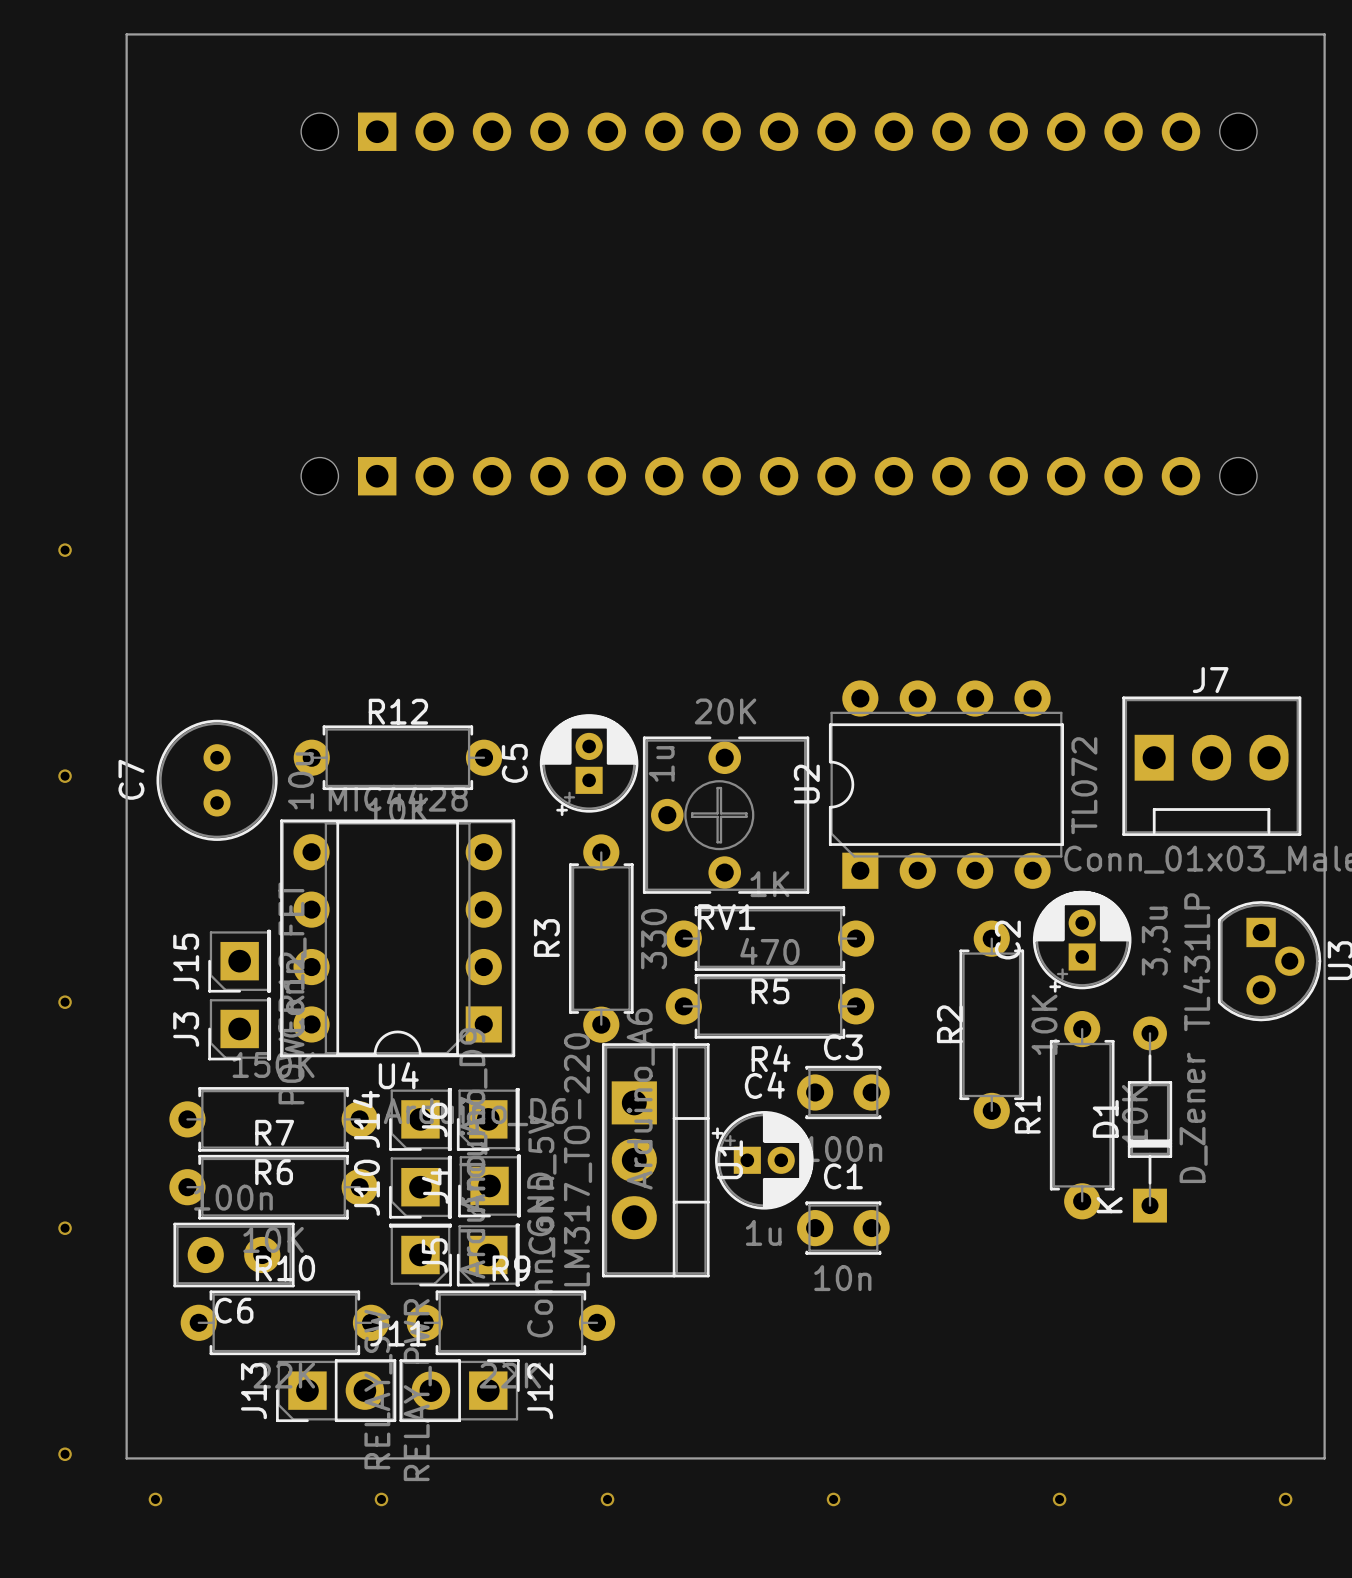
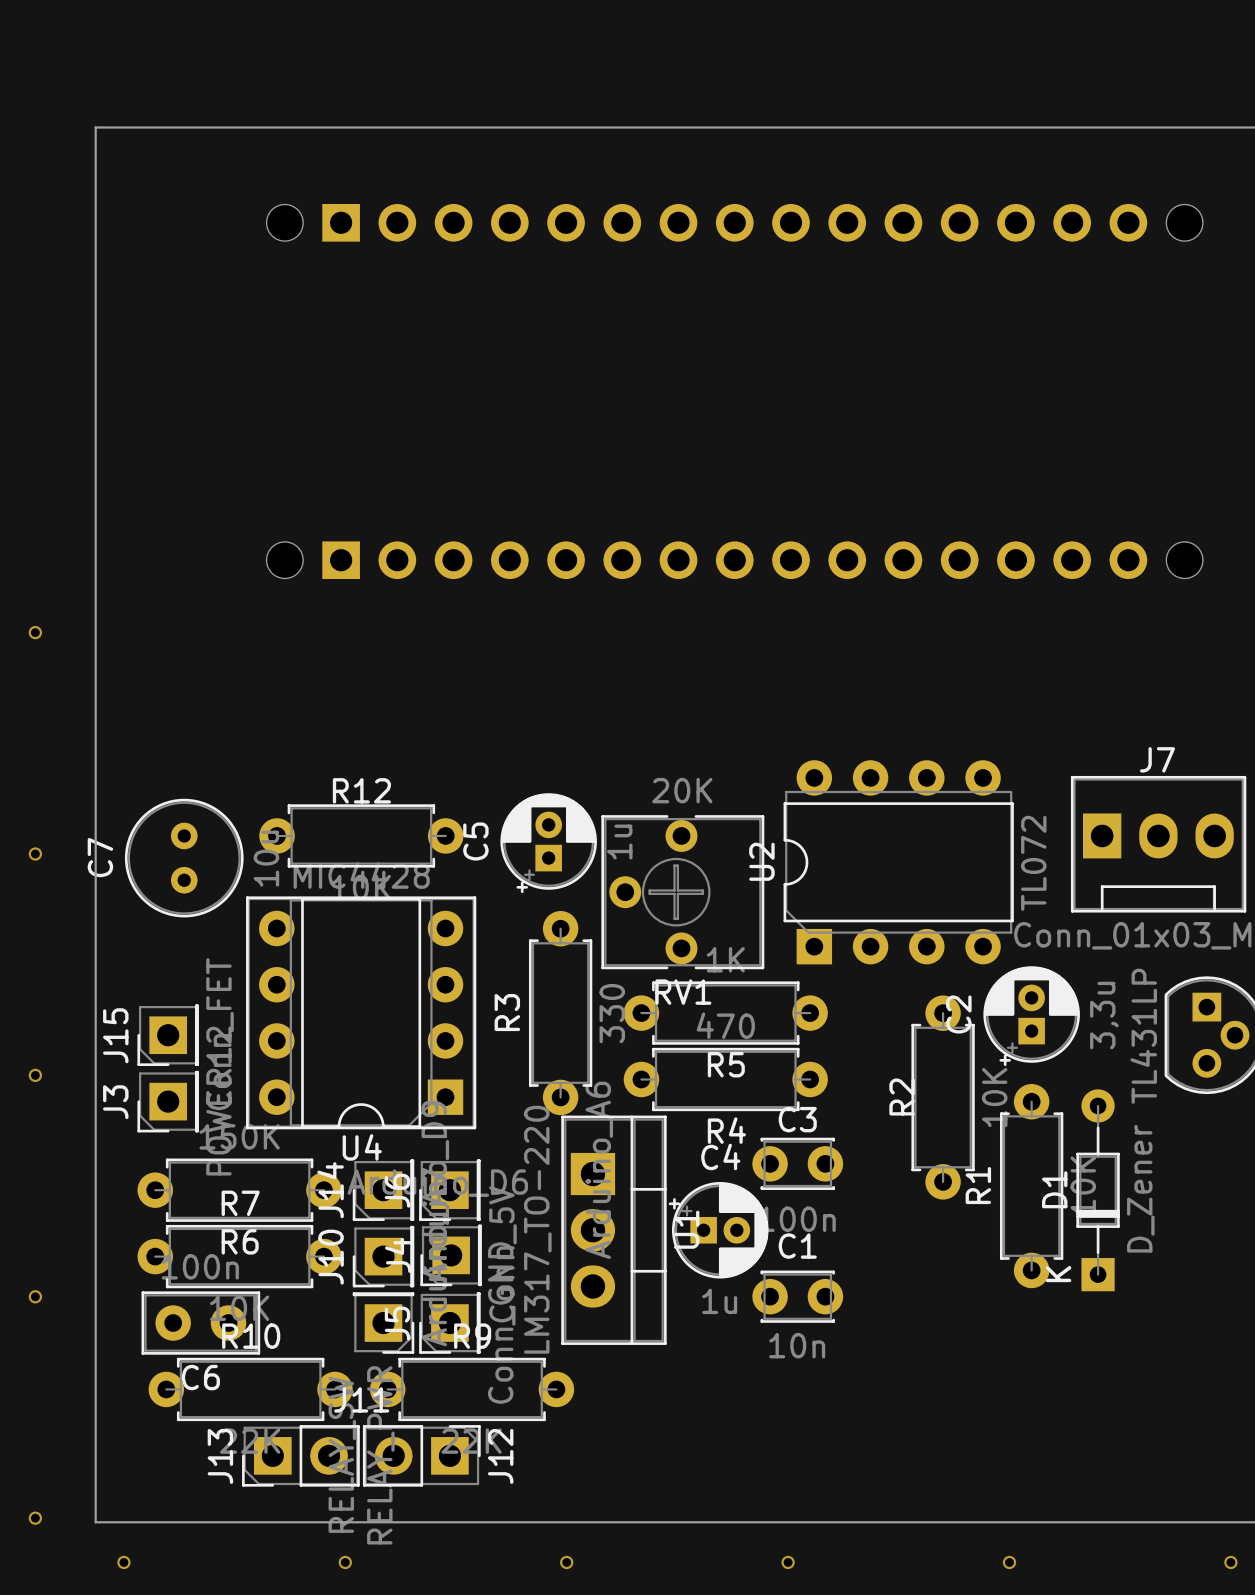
J15 position: (239, 961) -> (168, 1035)
J3 position: (239, 1028) -> (168, 1101)

